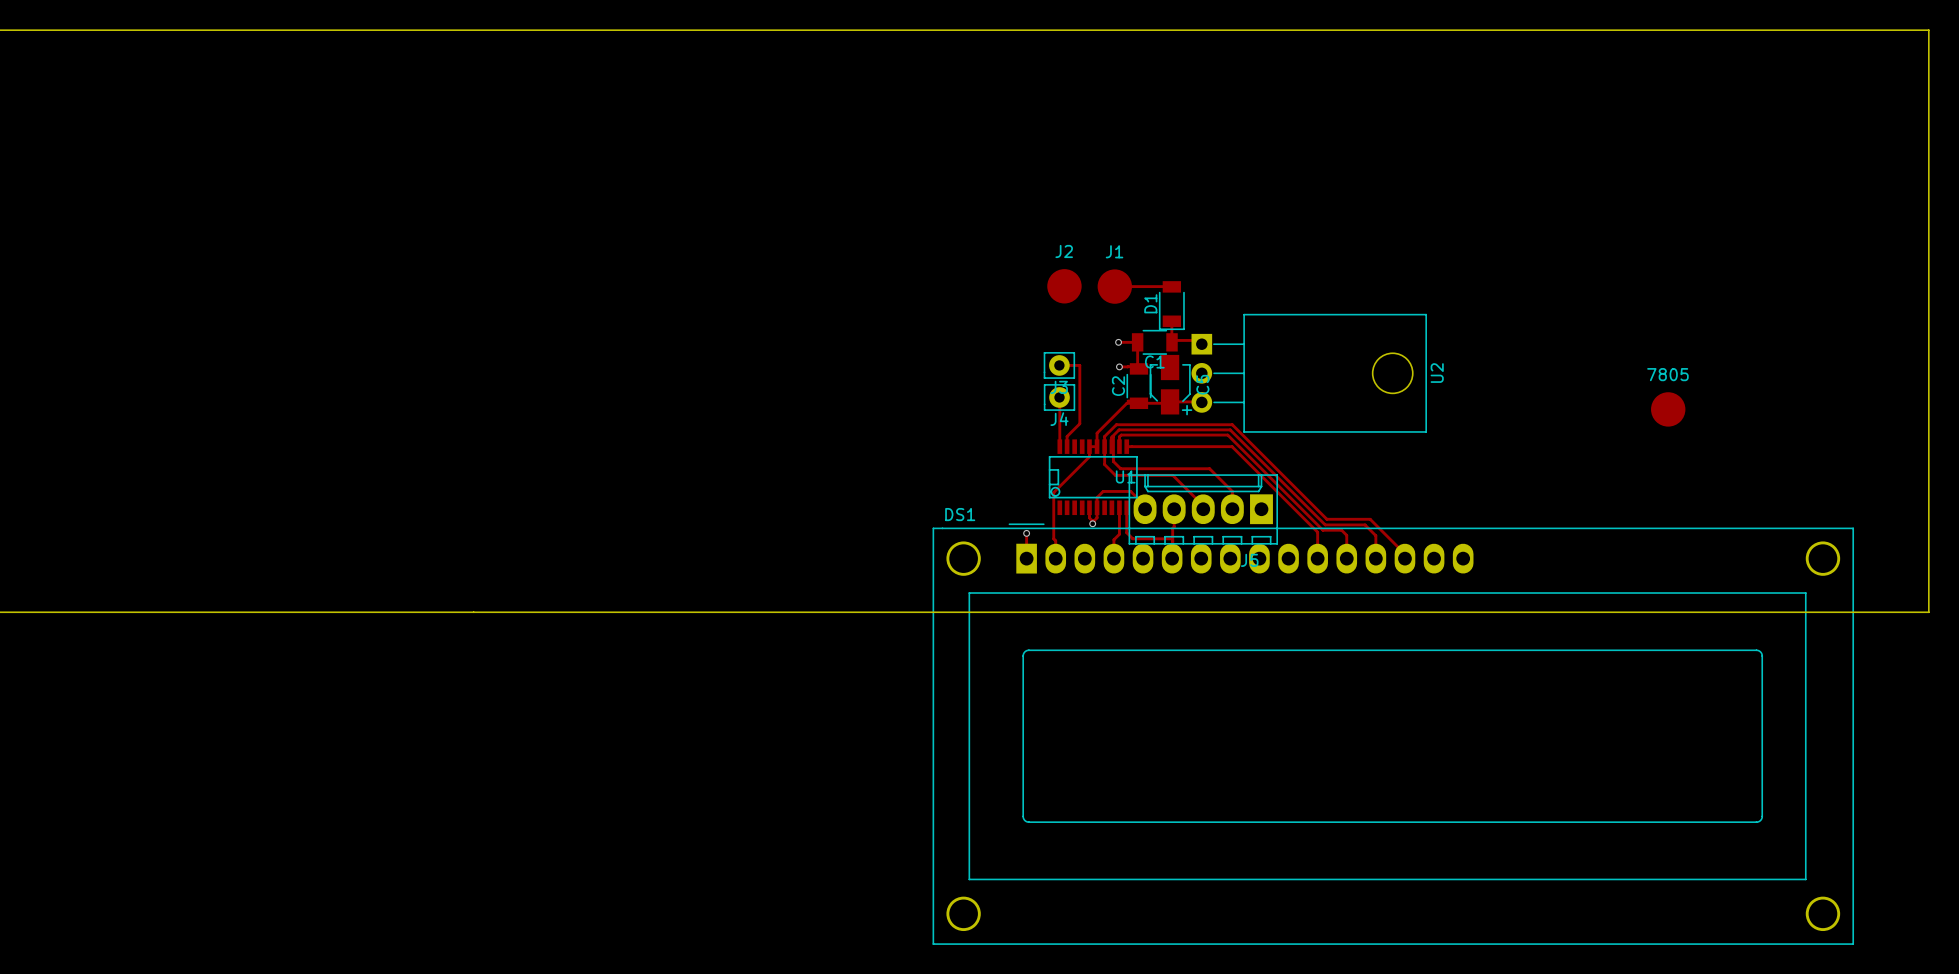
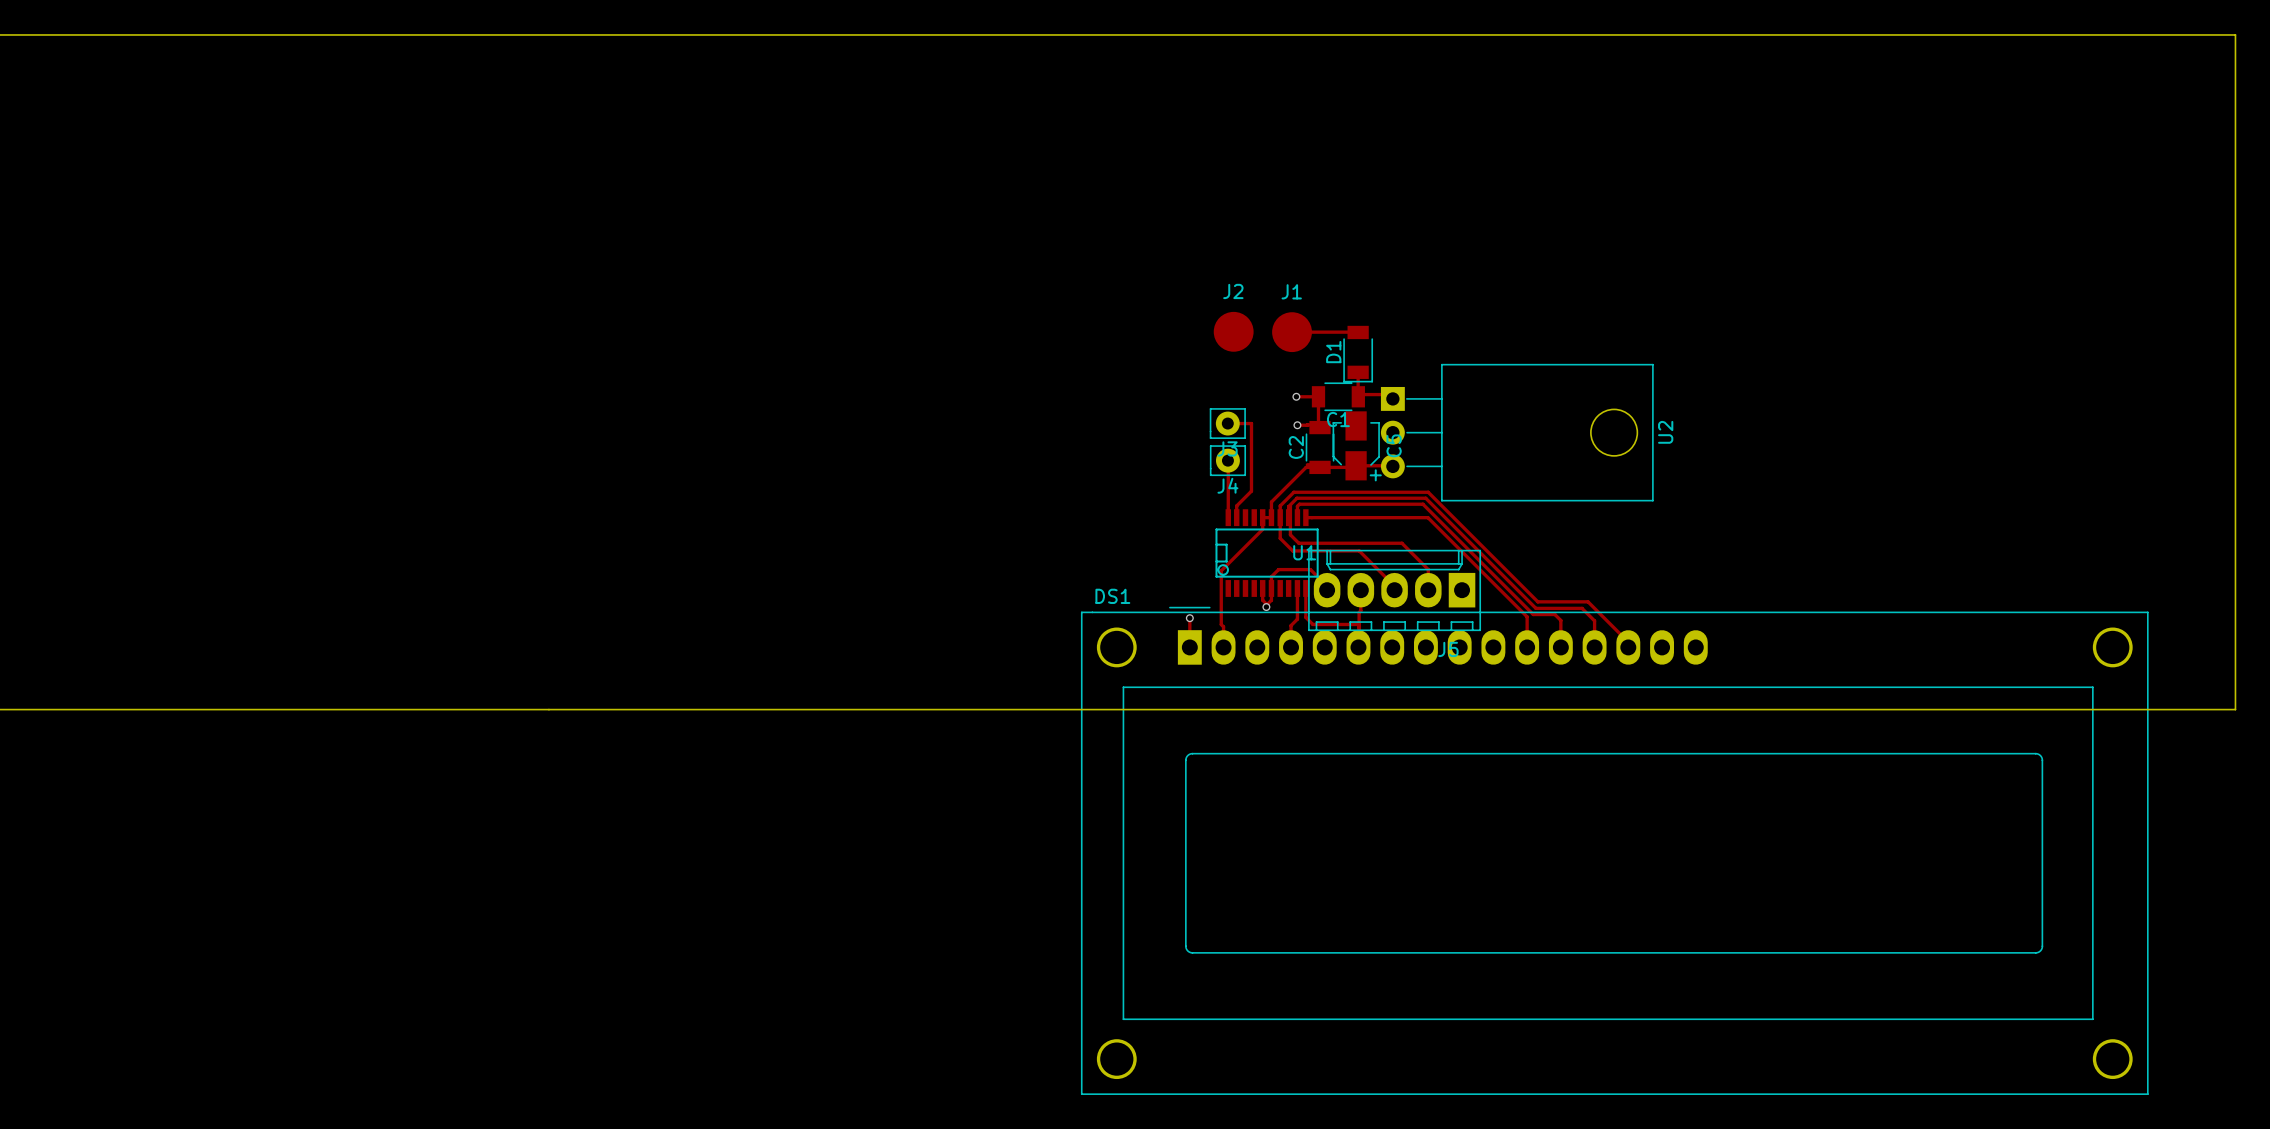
7805: (1668, 409) -> none

